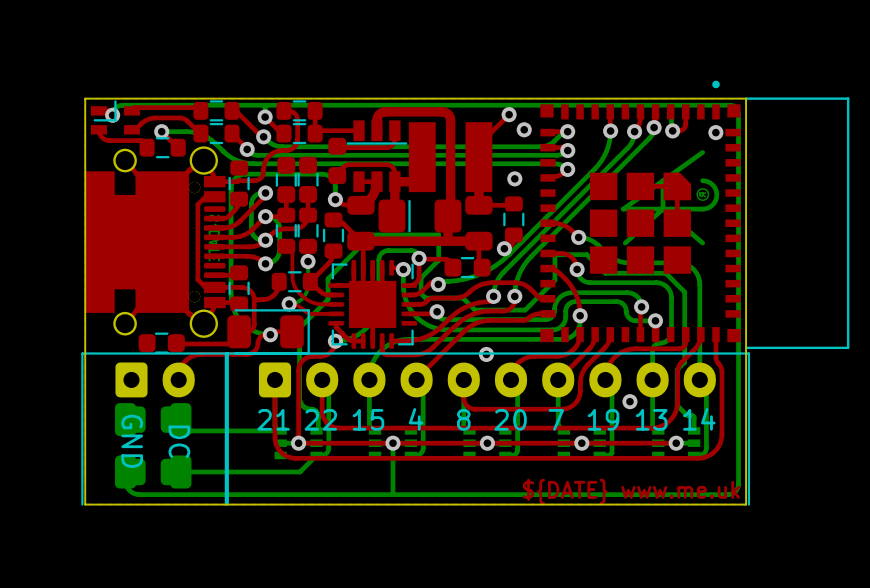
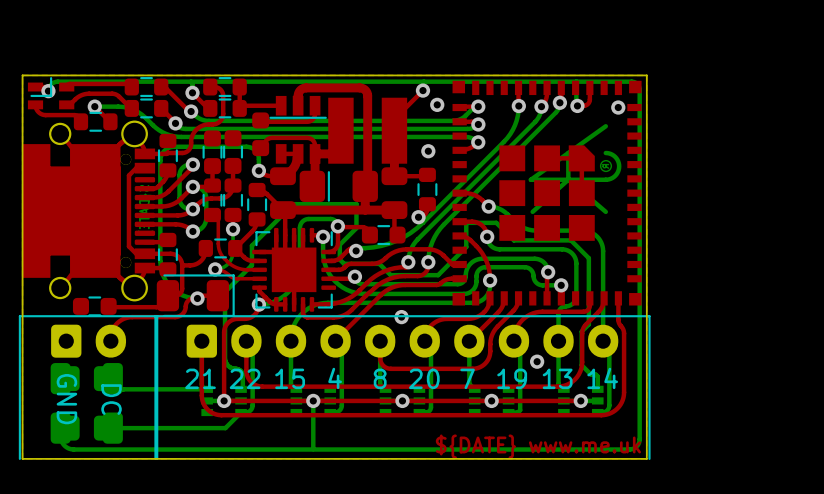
part: (694, 214) -> none

